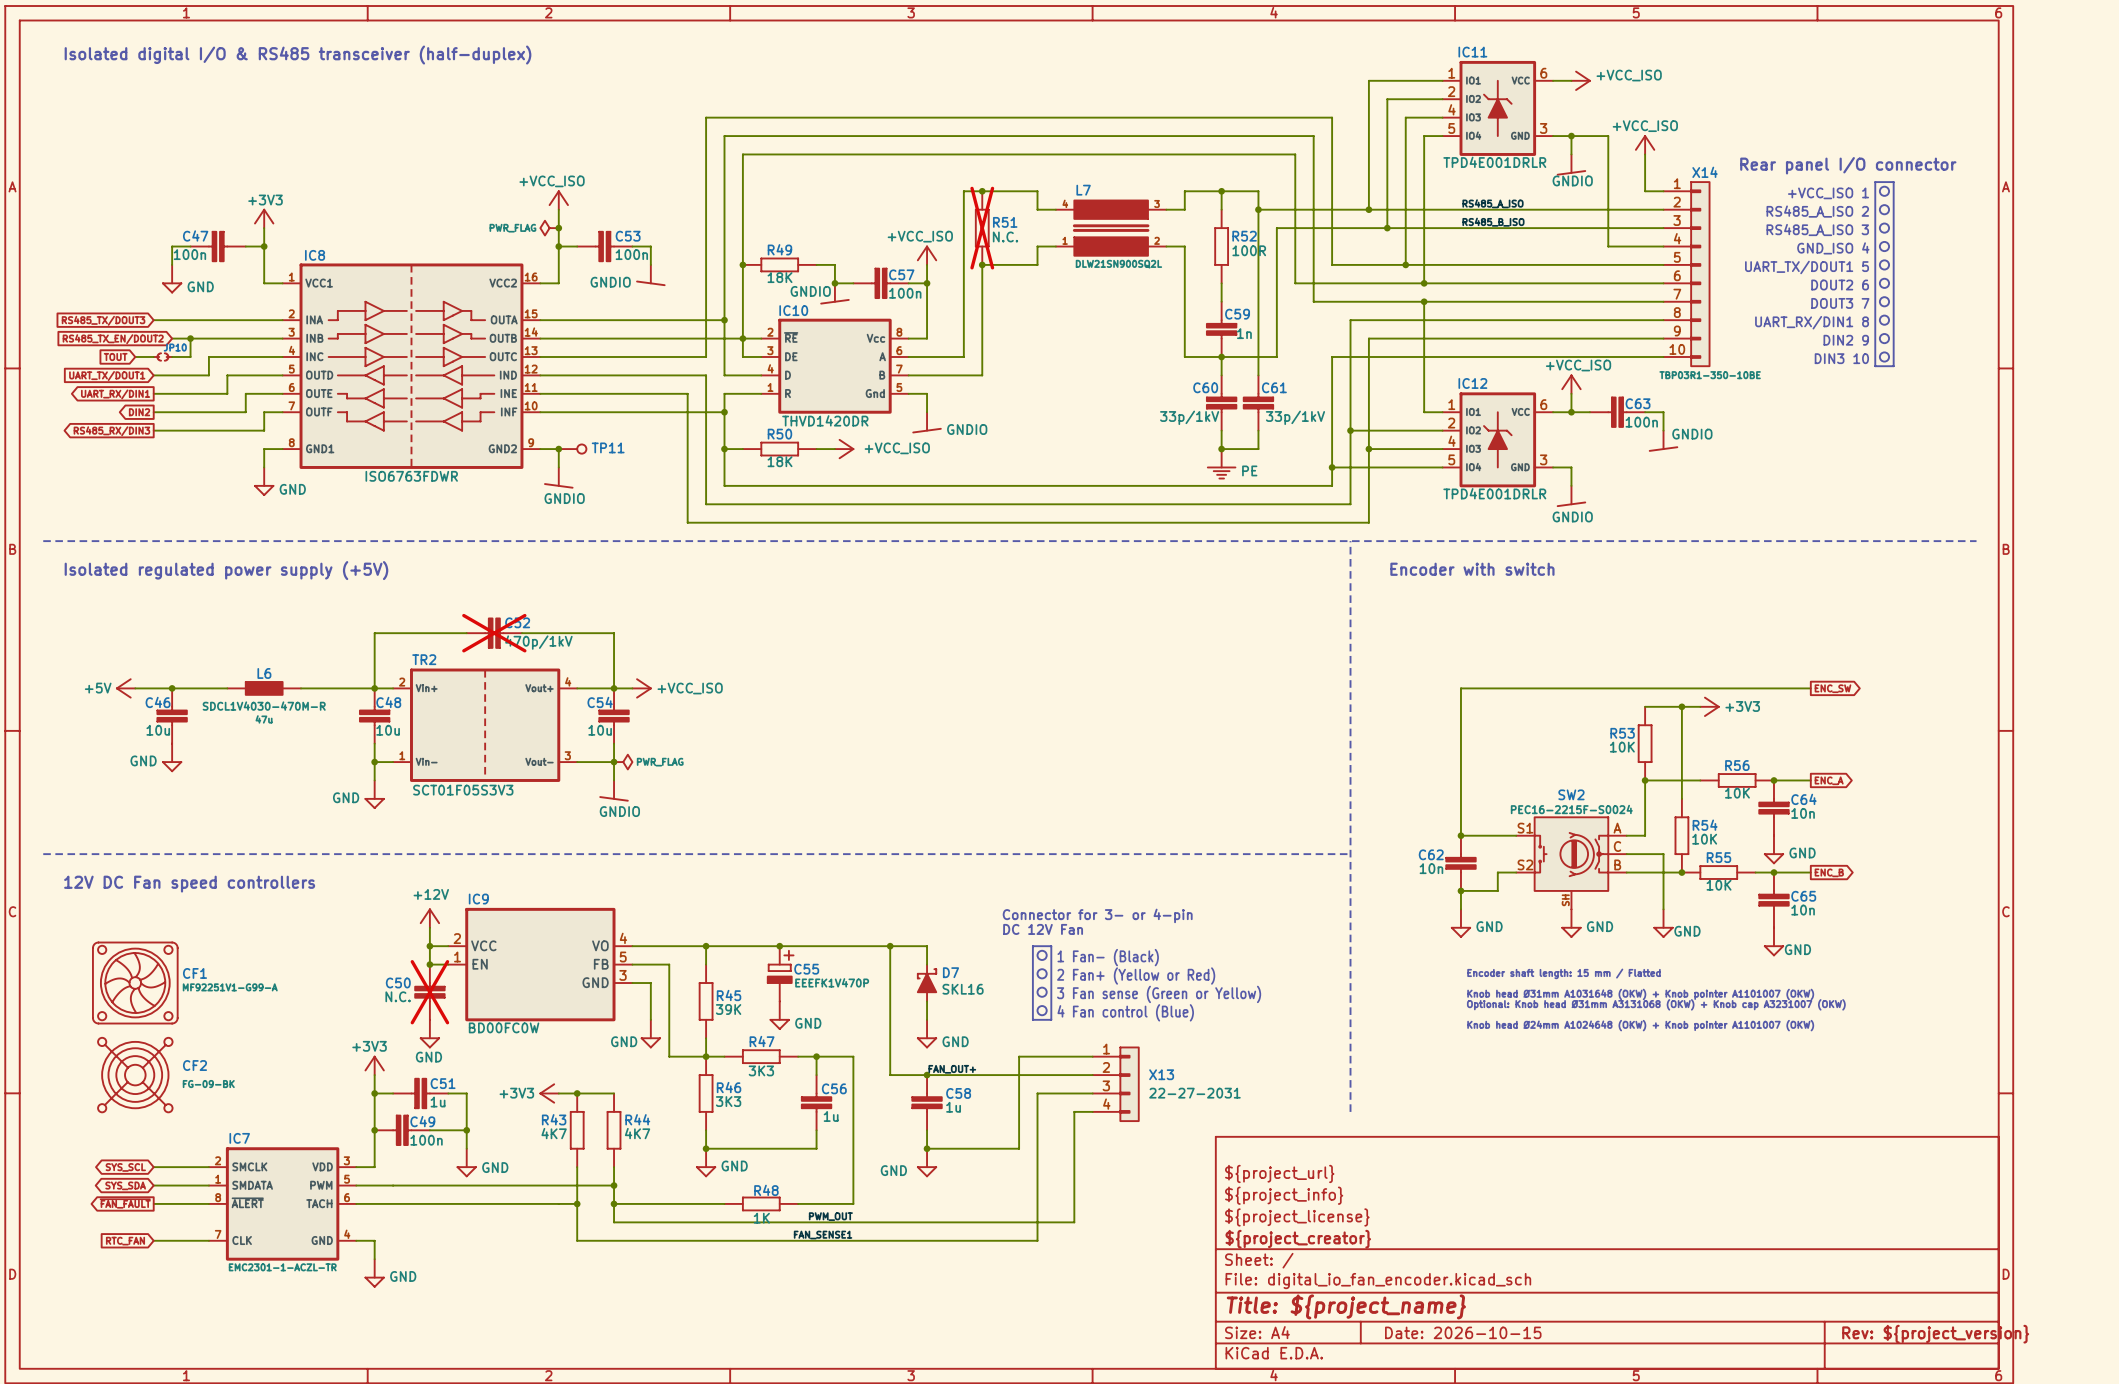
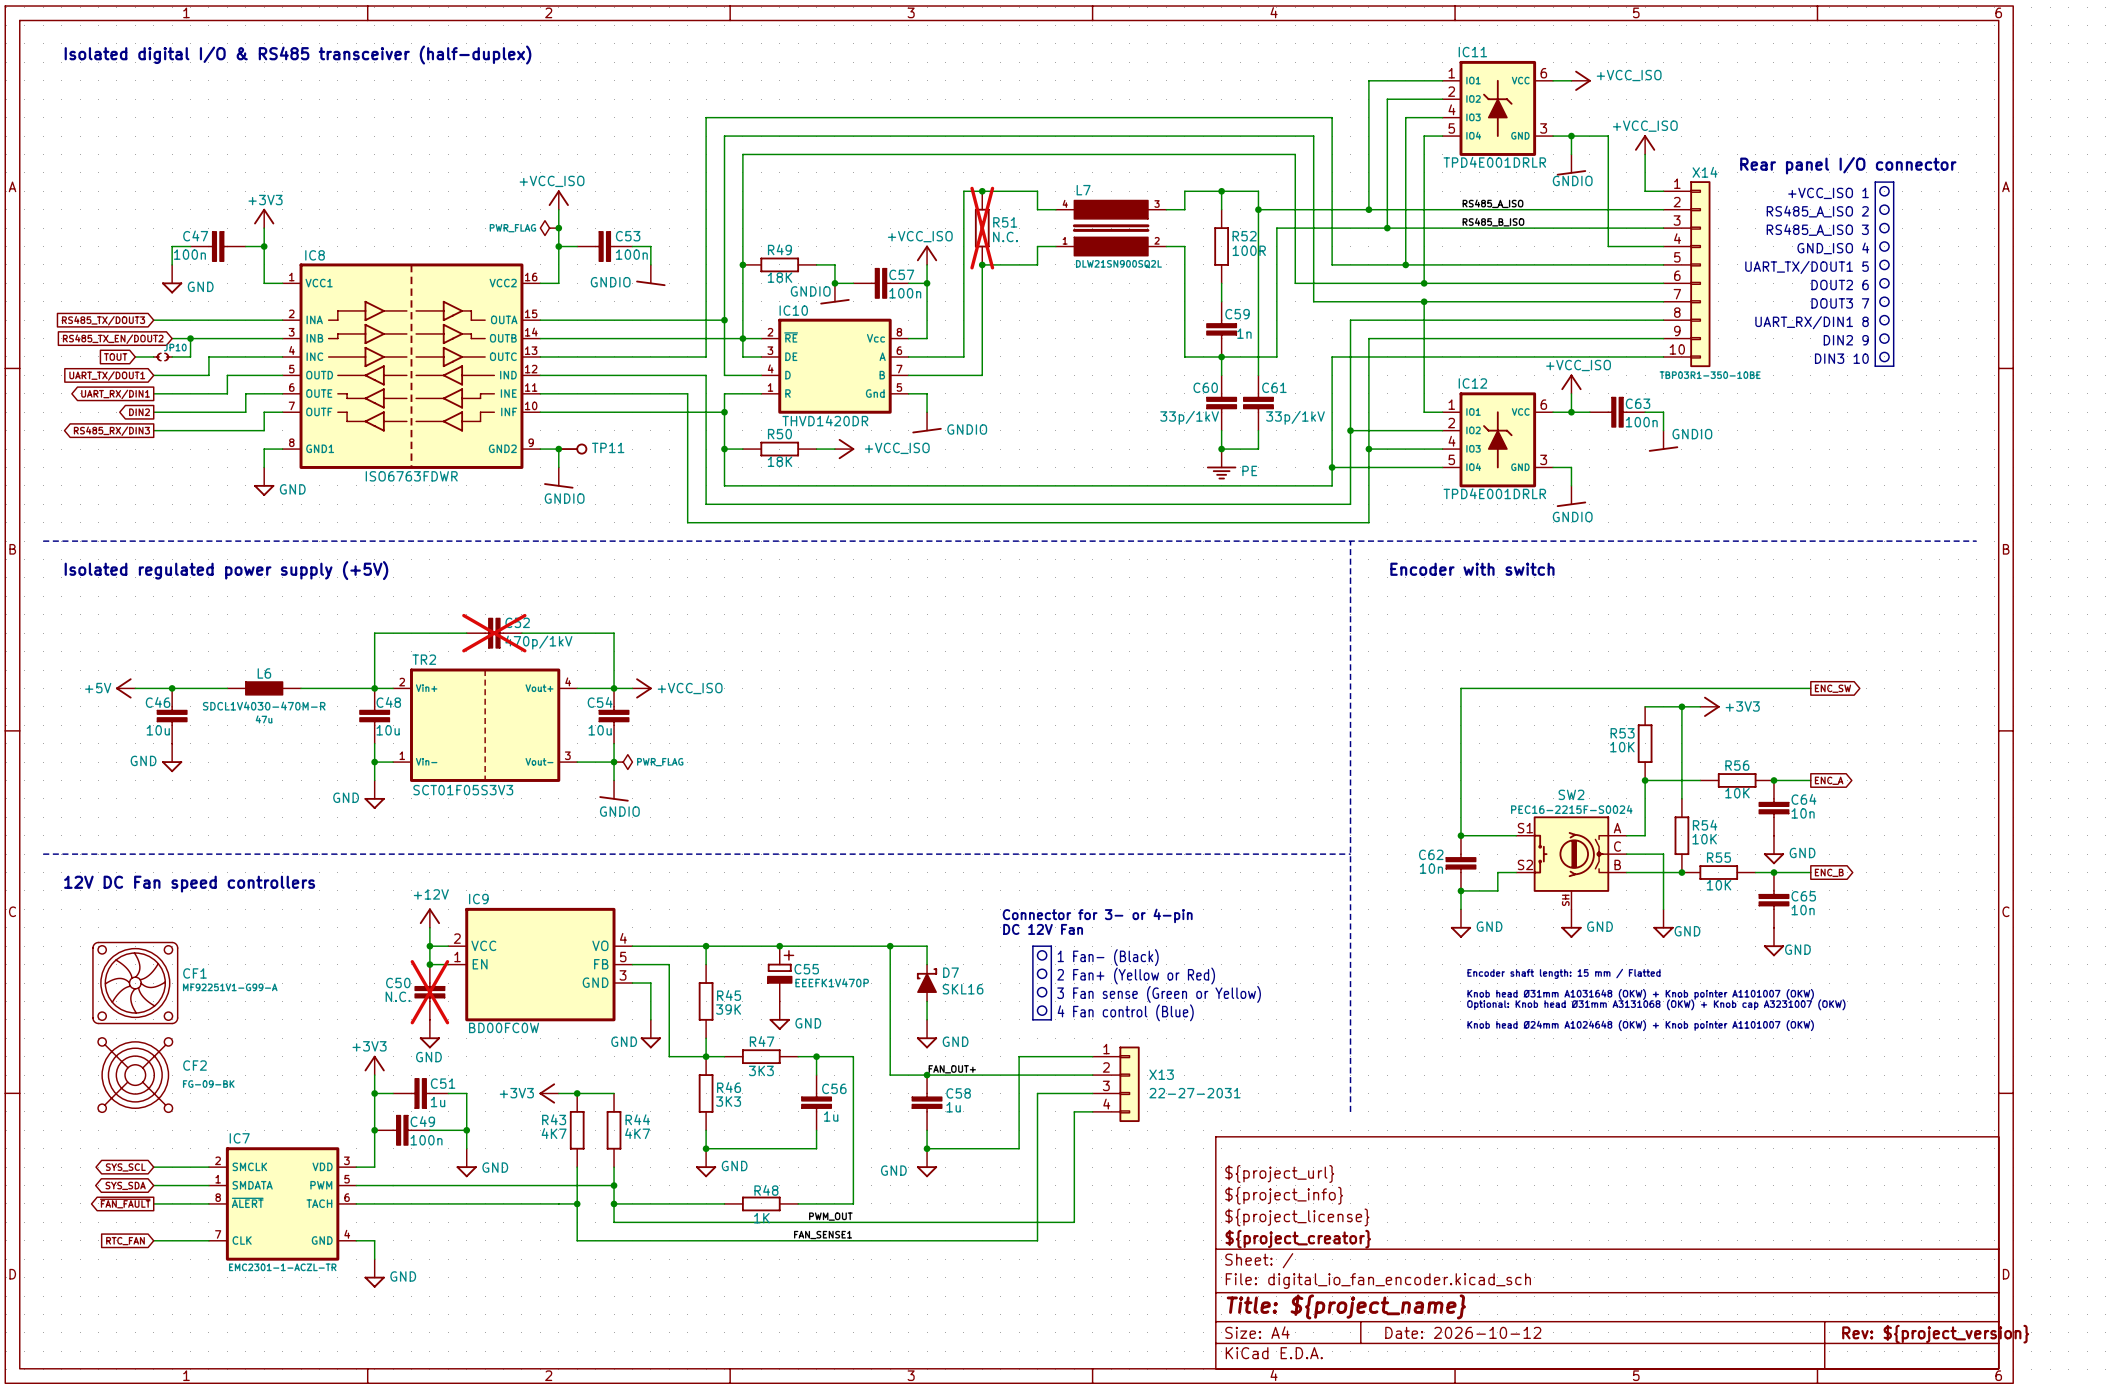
title block: Date: 2026-10-15 (1463, 1332) -> Date: 2026-10-12 (1463, 1332)

